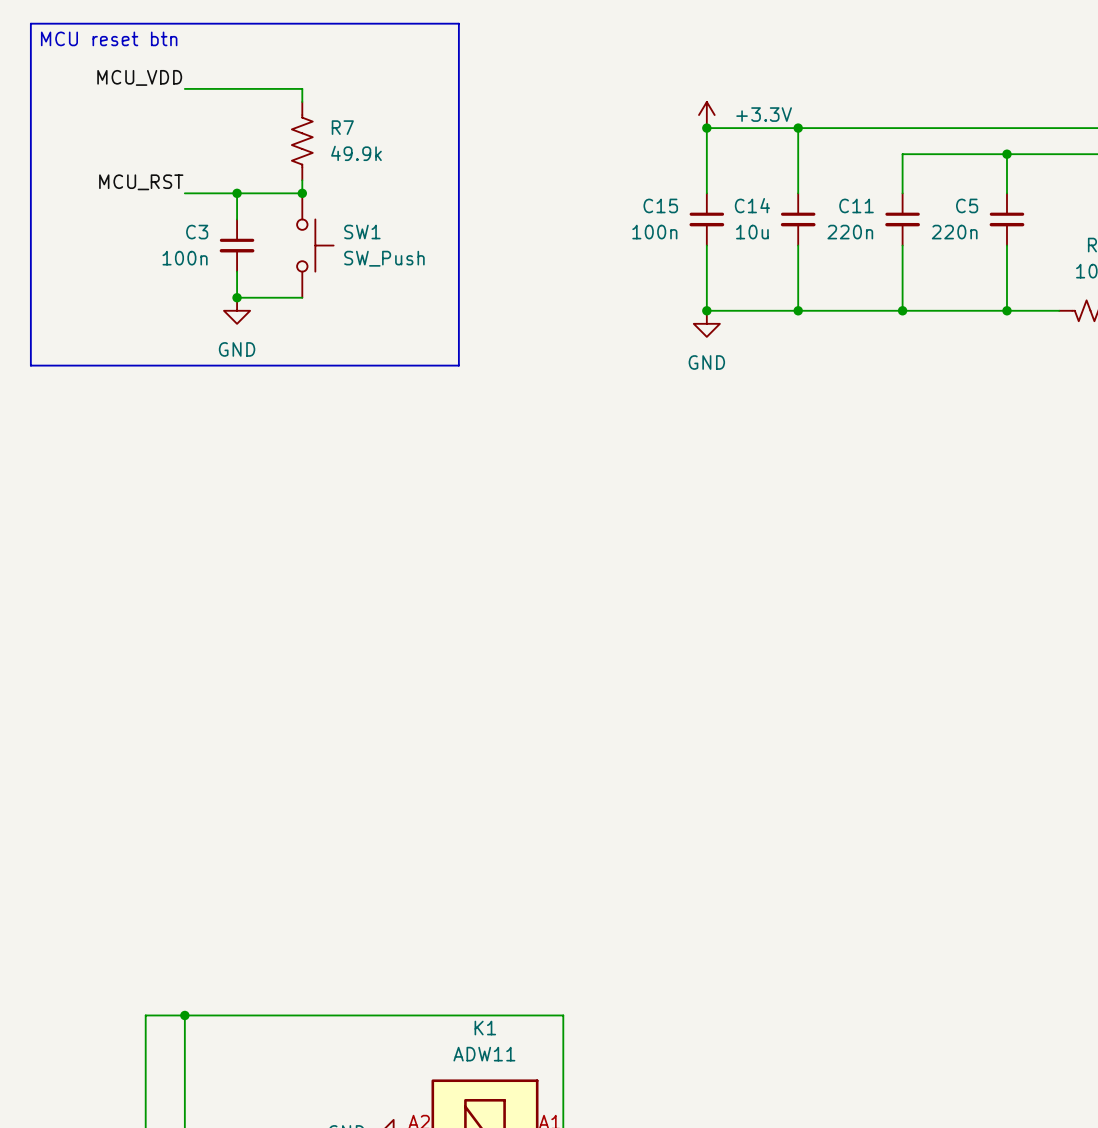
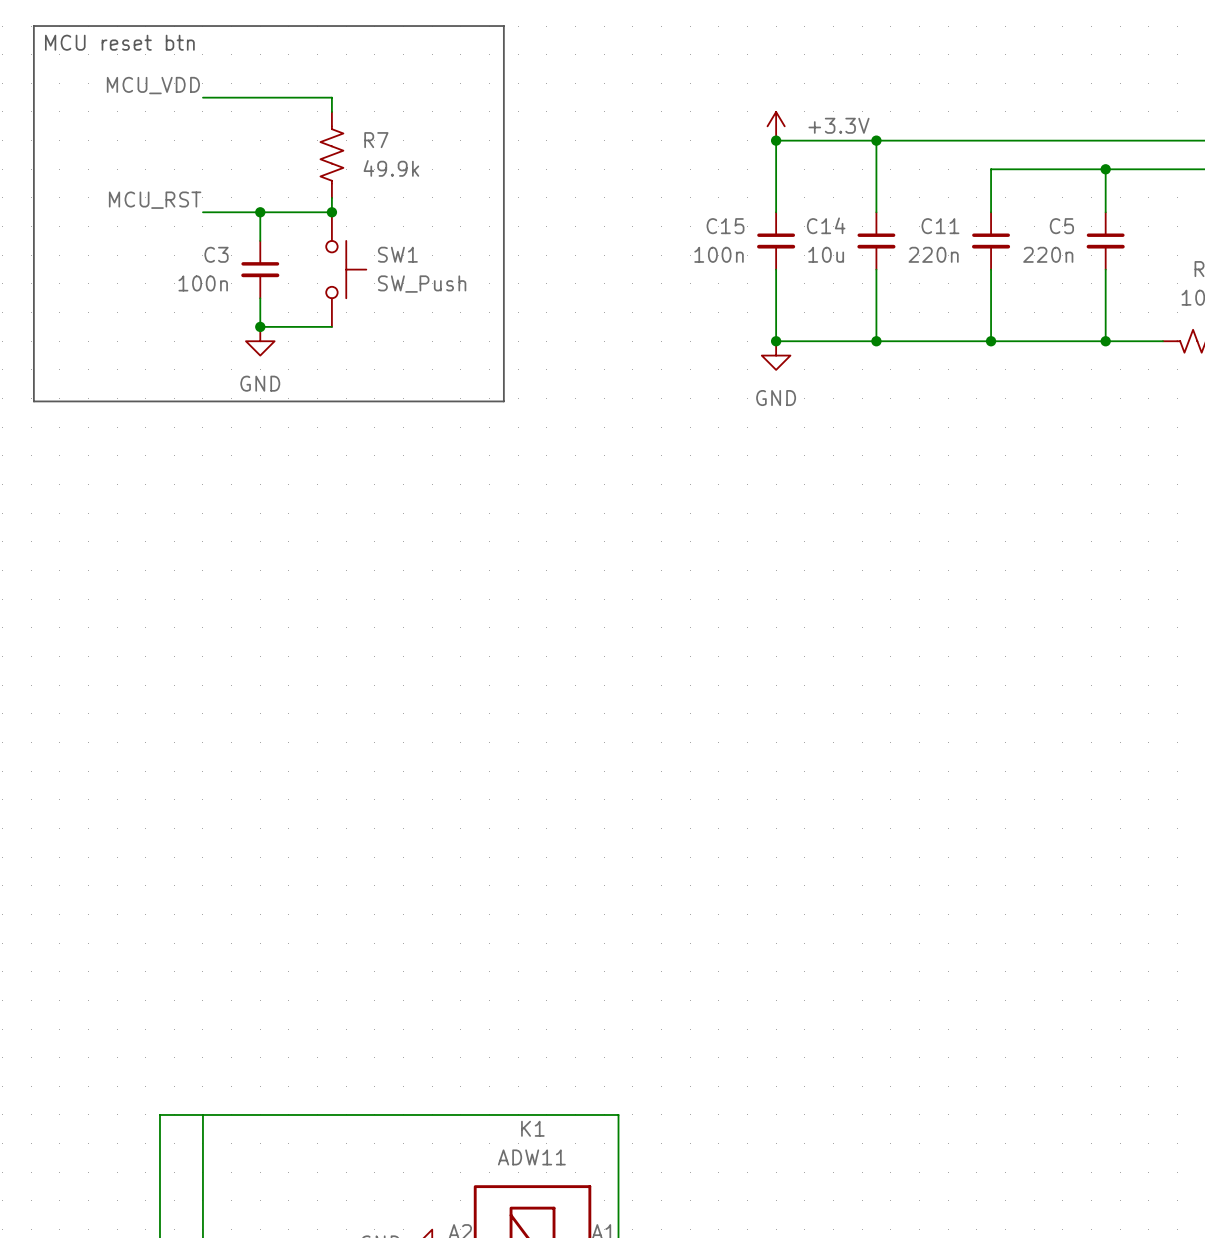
junction: (184, 1015) -> none

